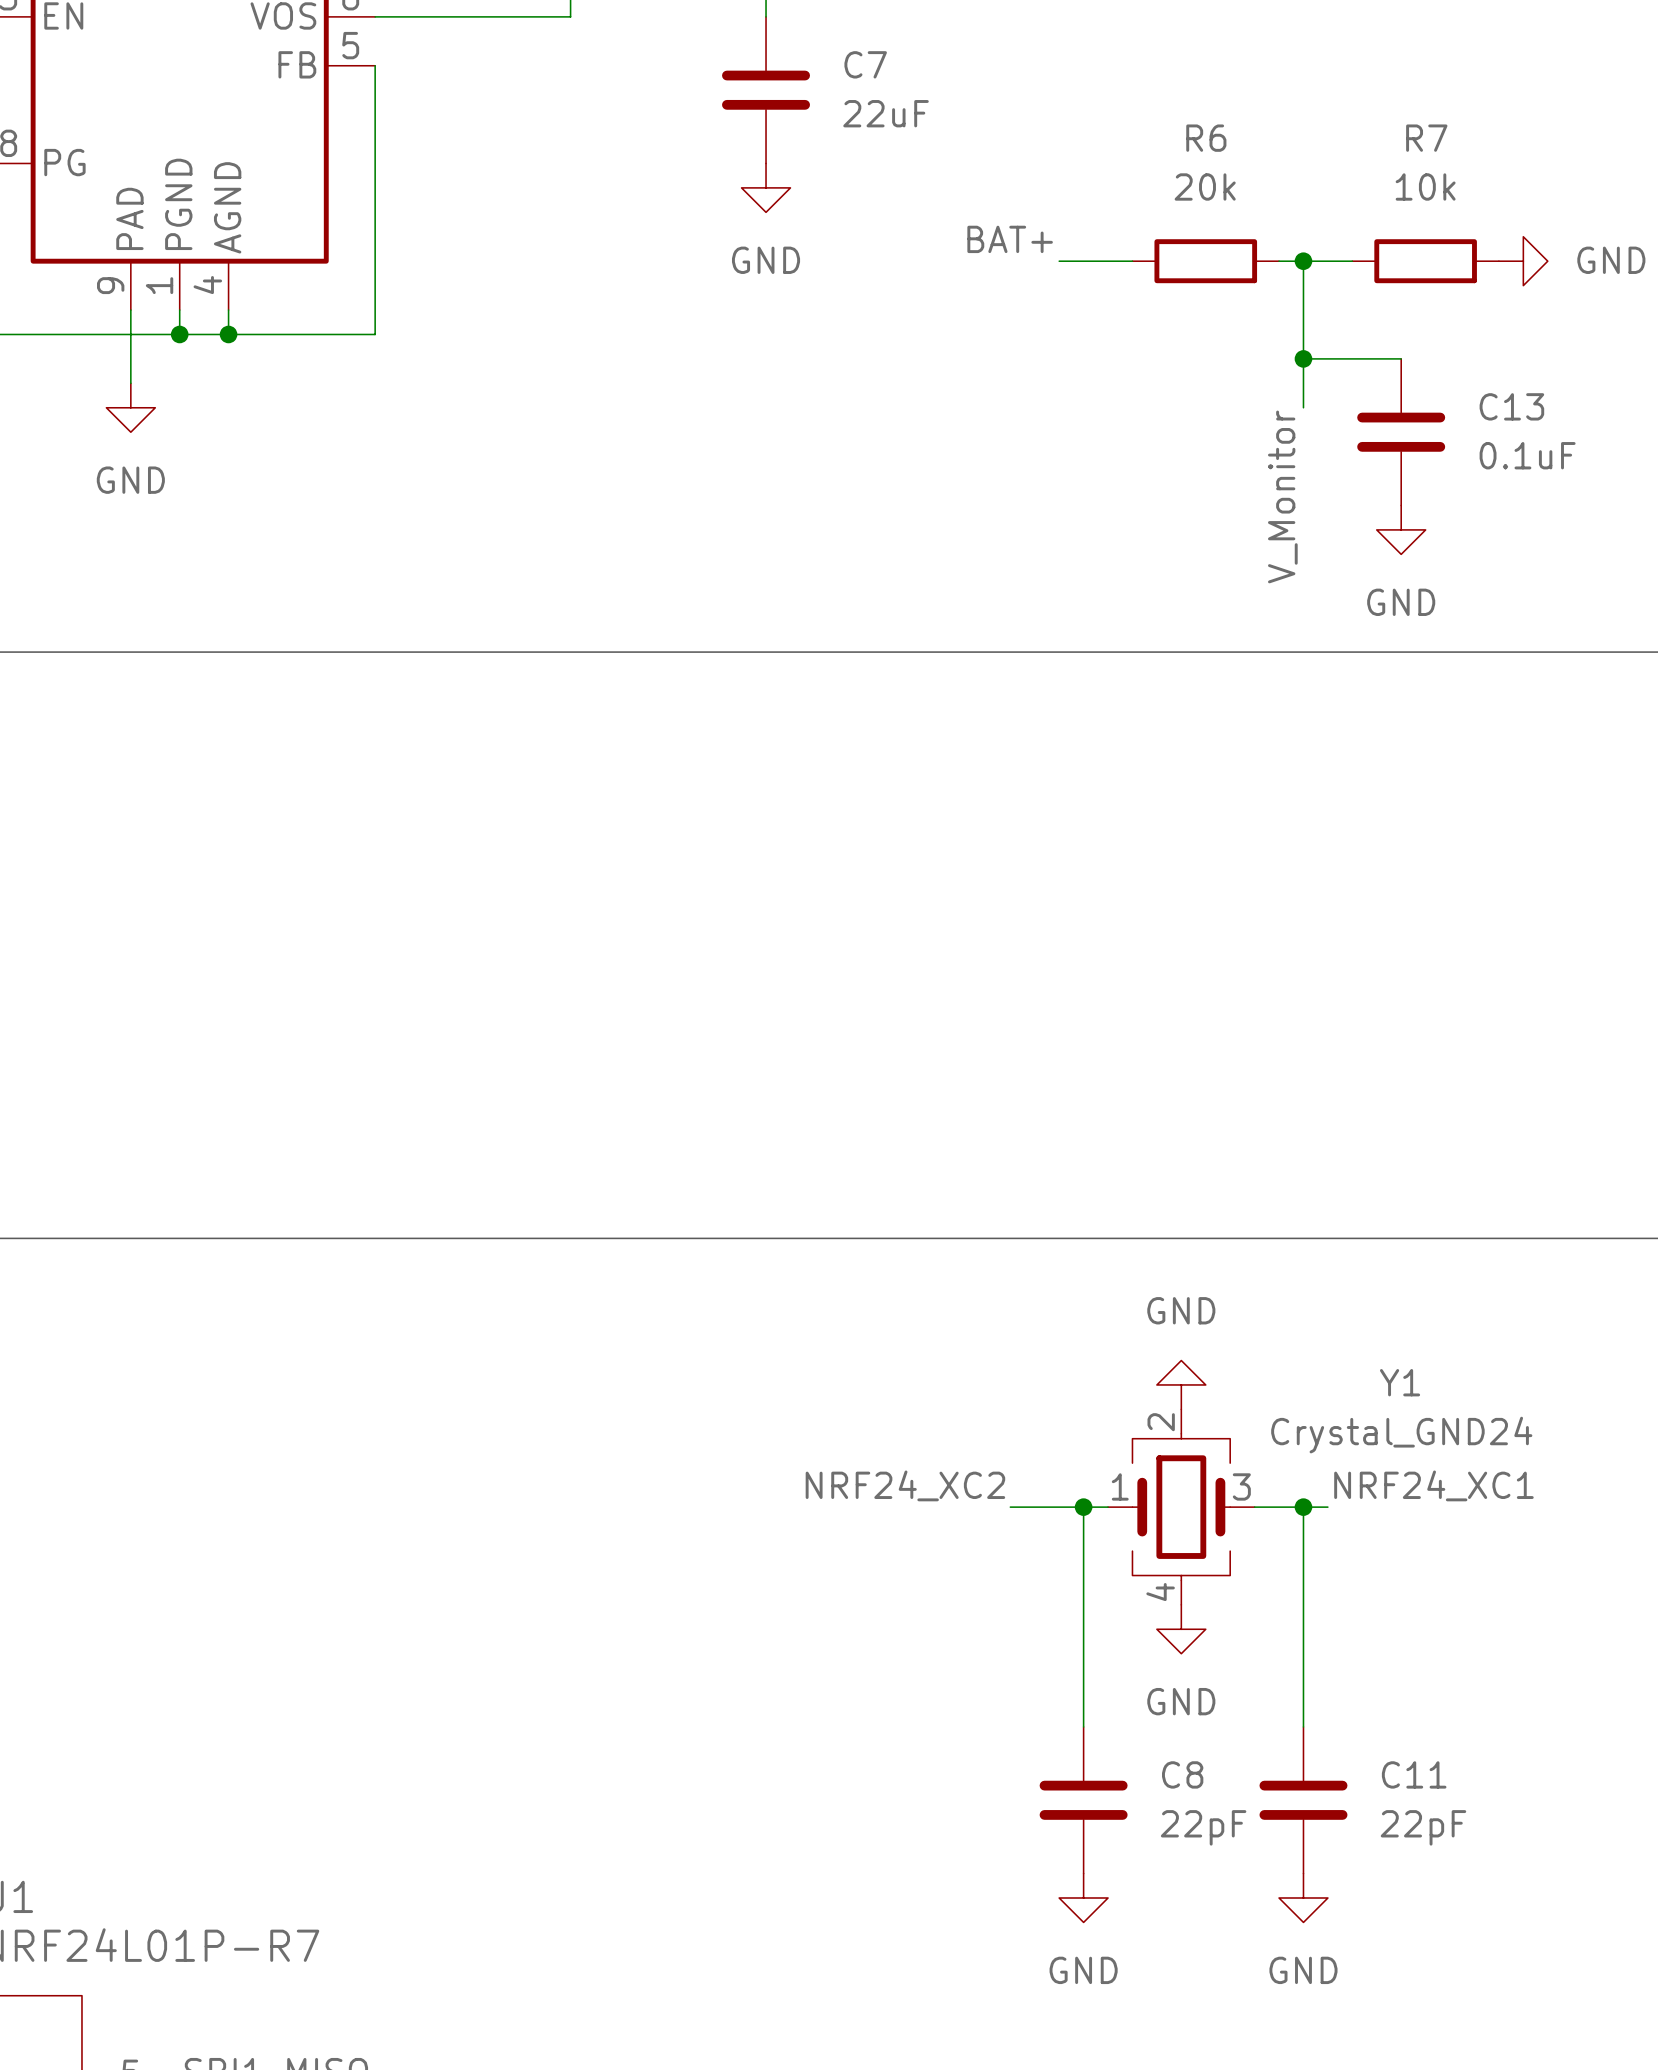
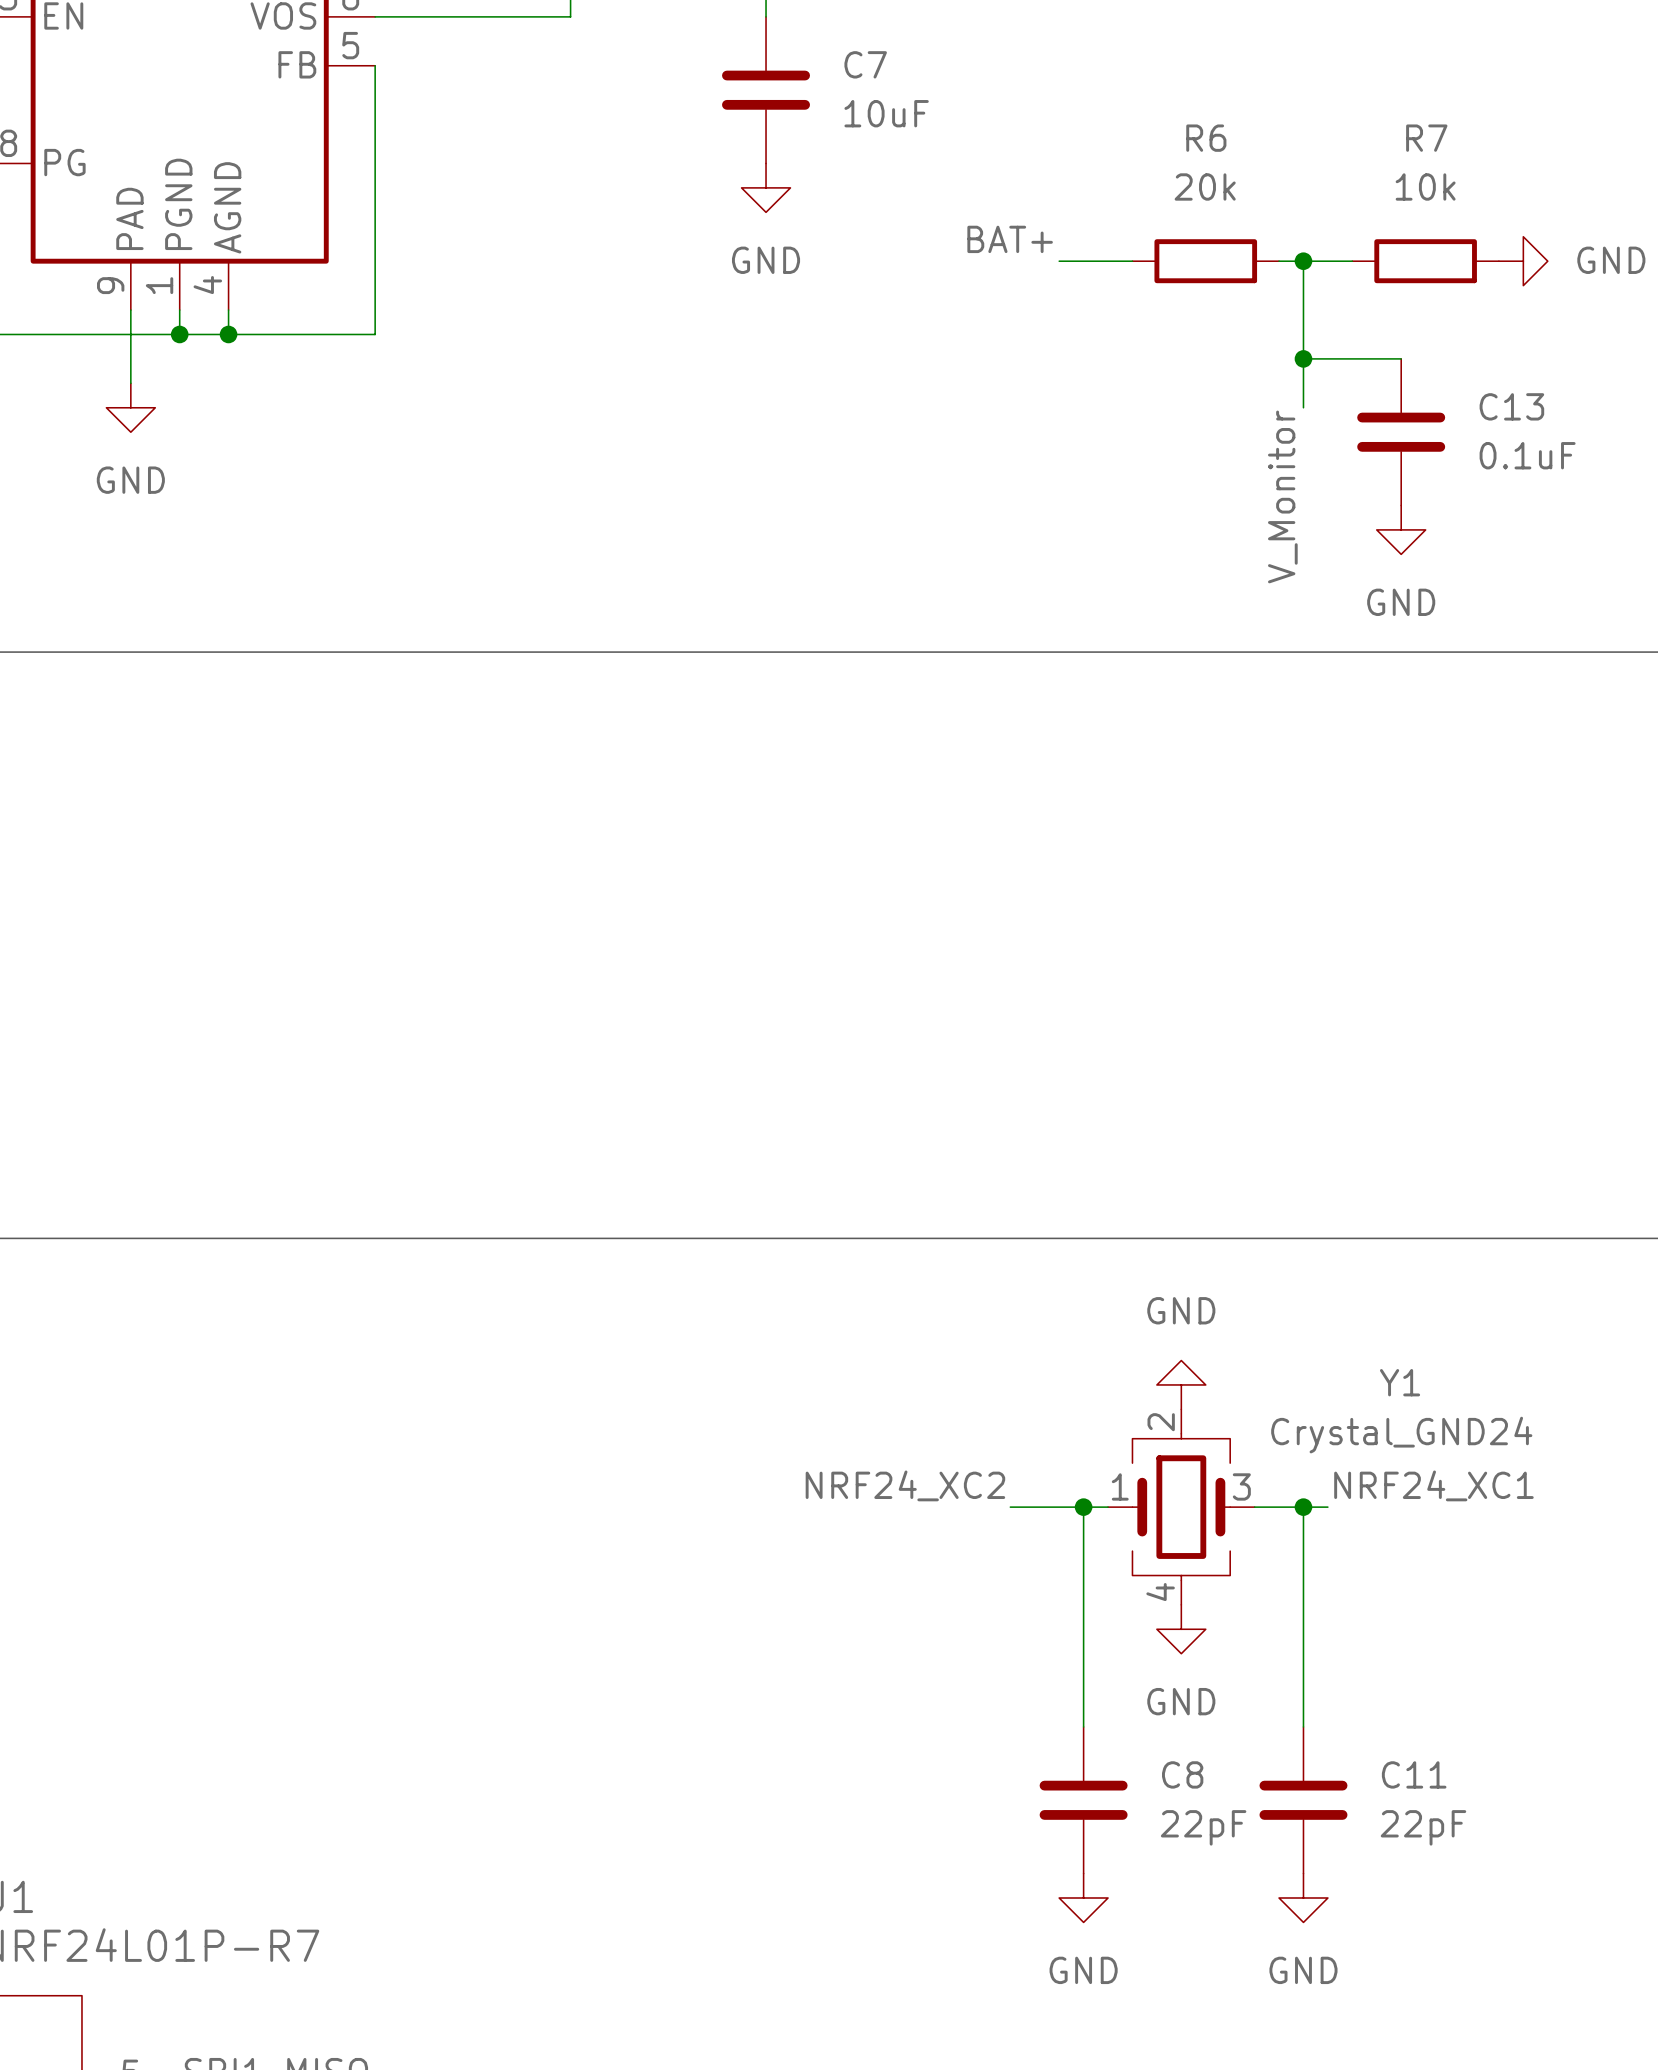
C7 value: 22uF (886, 113) -> 10uF (886, 113)

